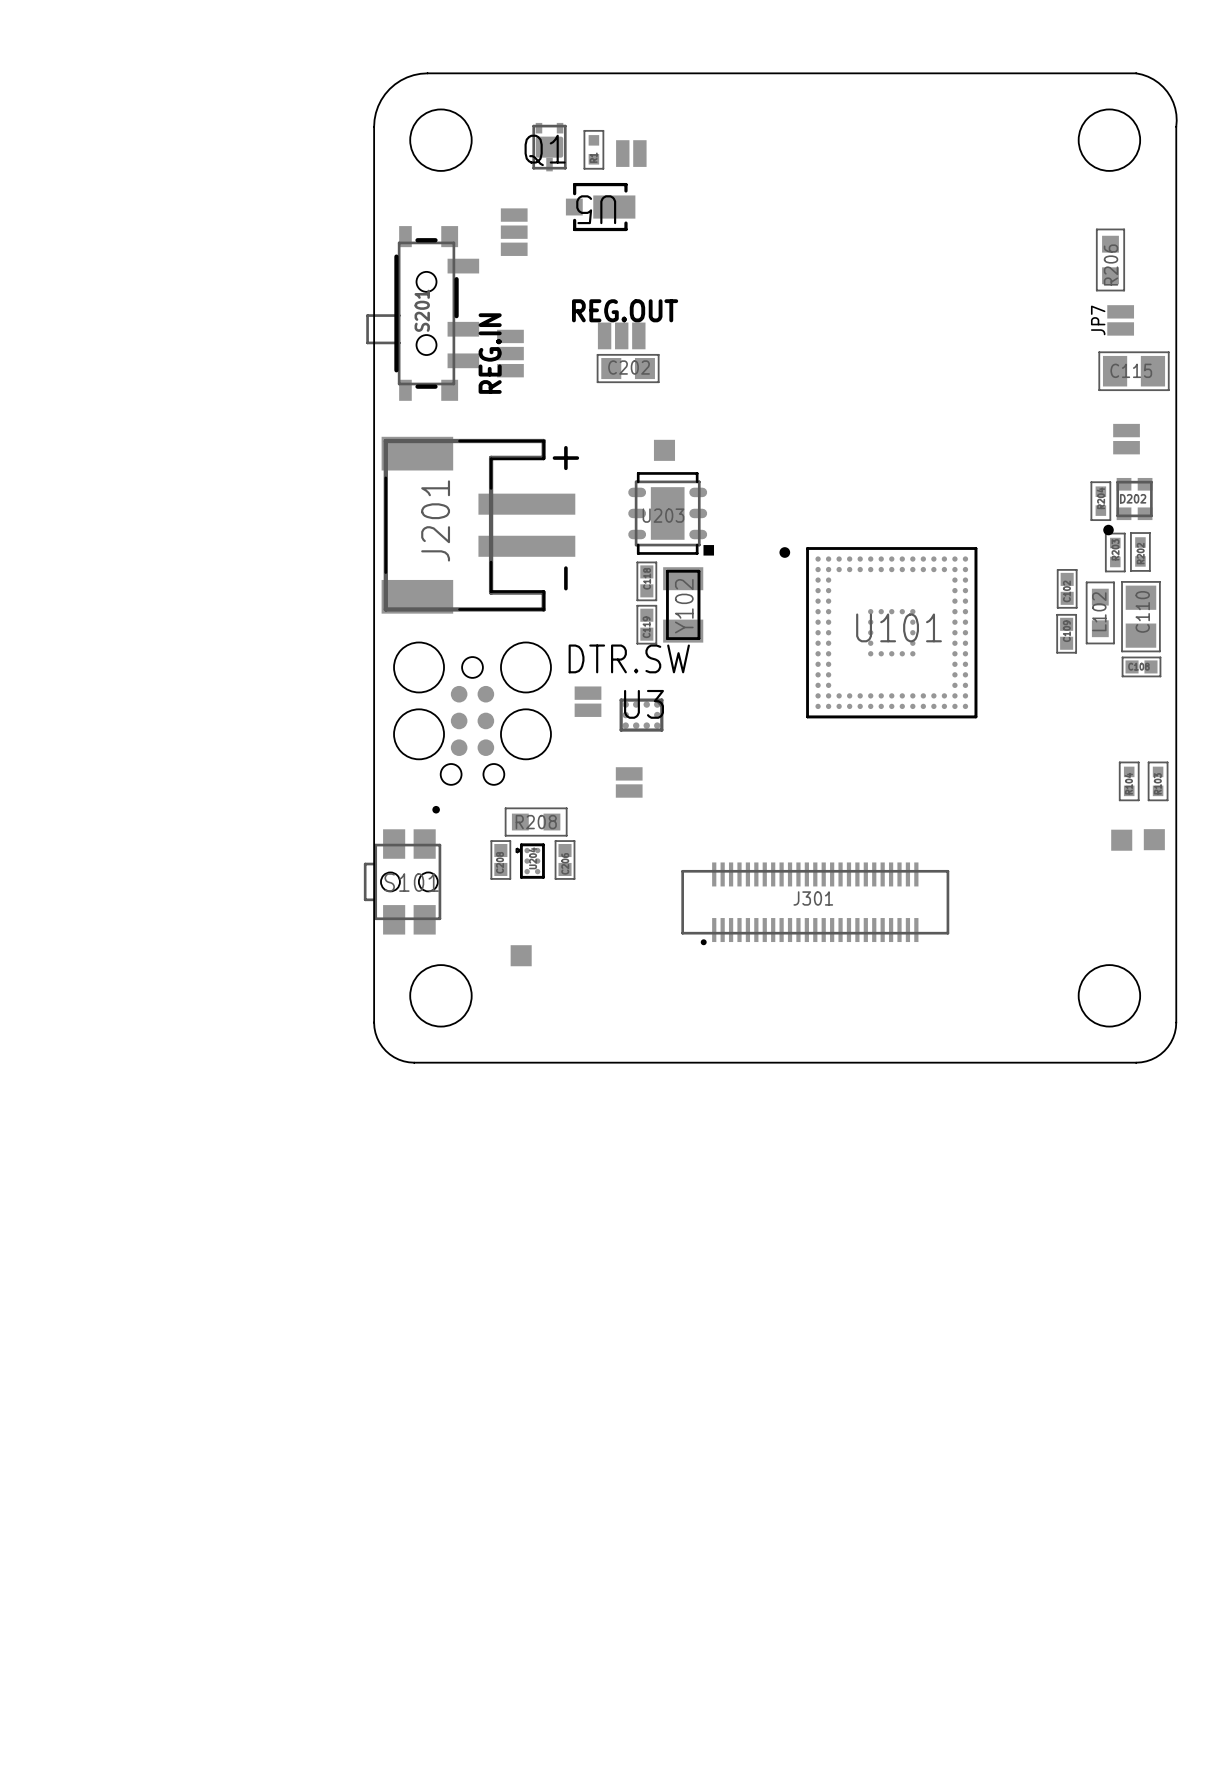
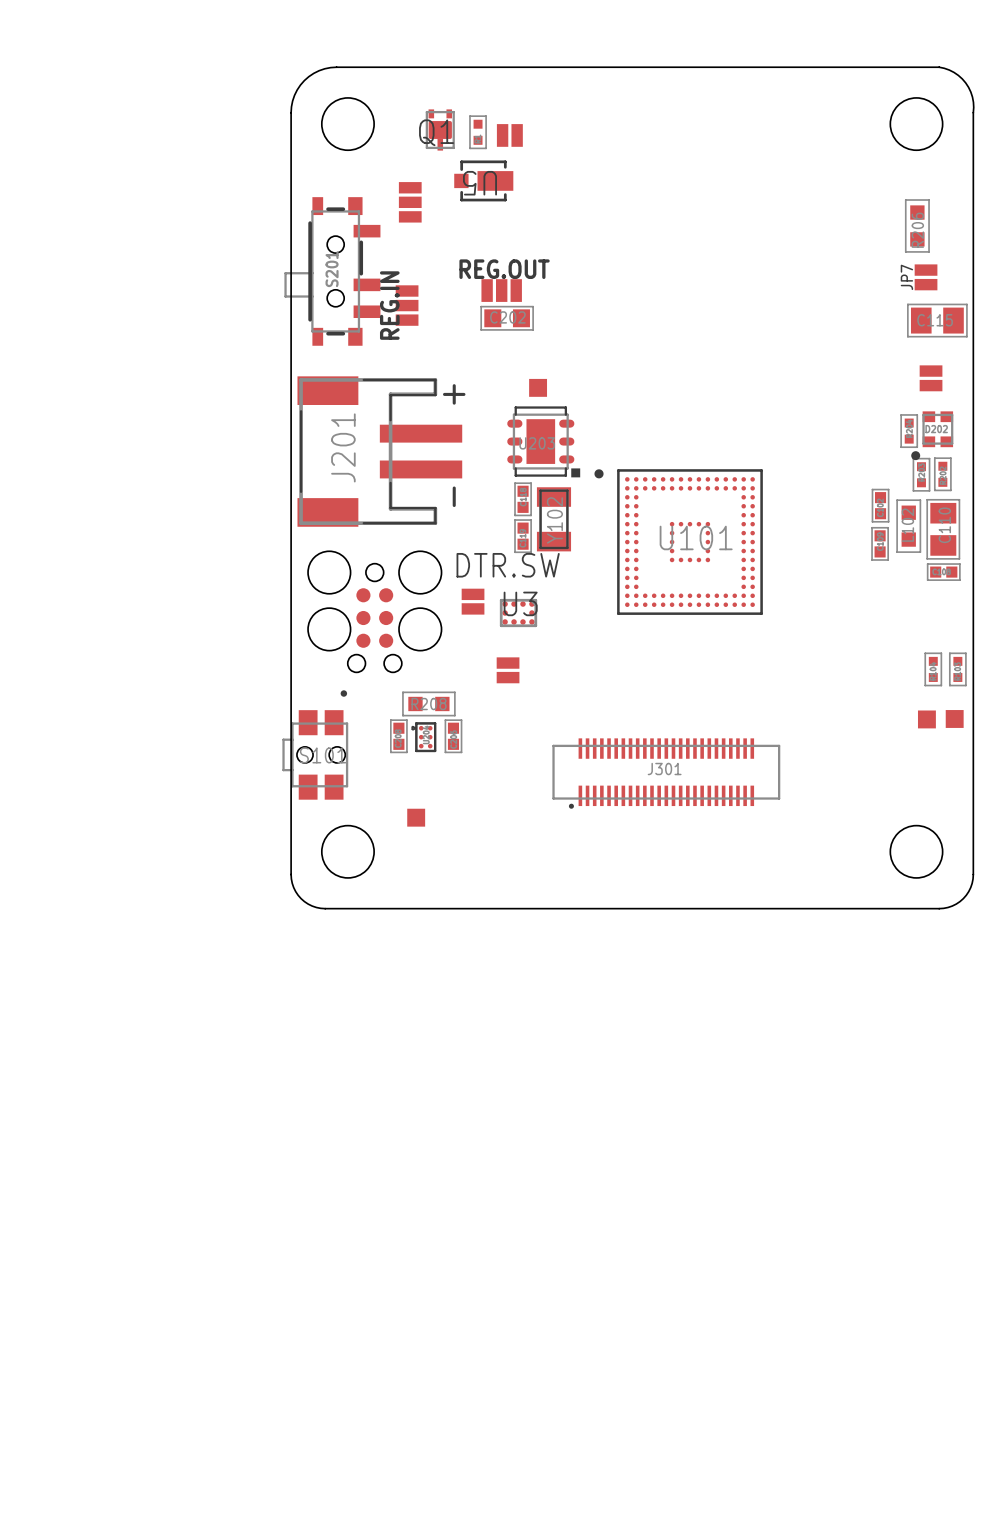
U101 position: (878, 632) -> (678, 542)

